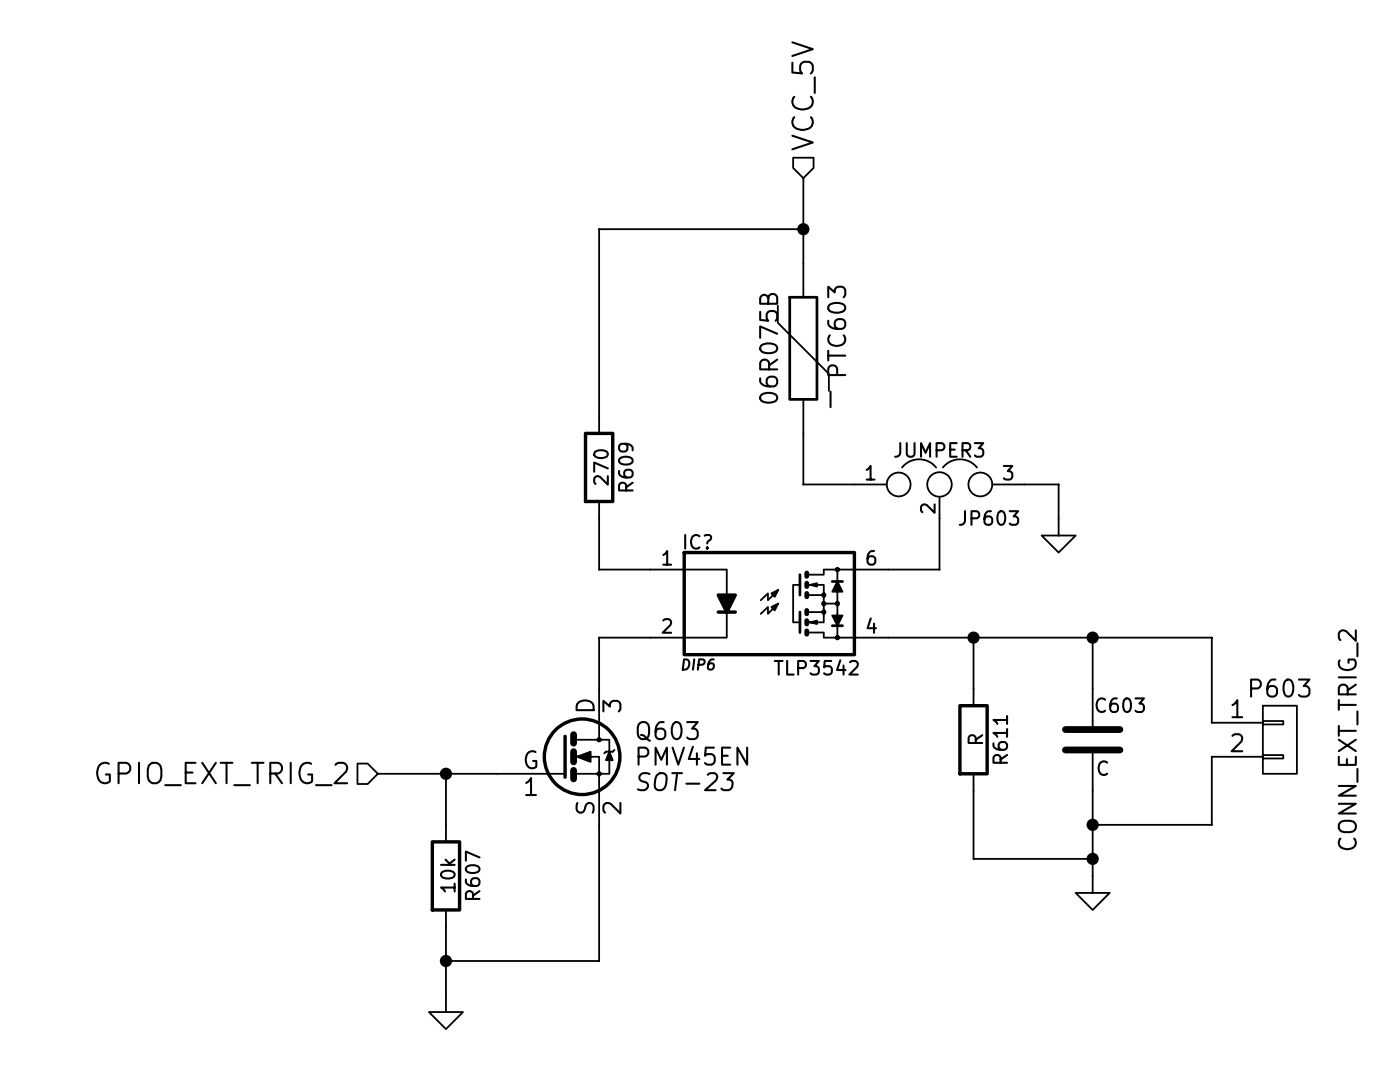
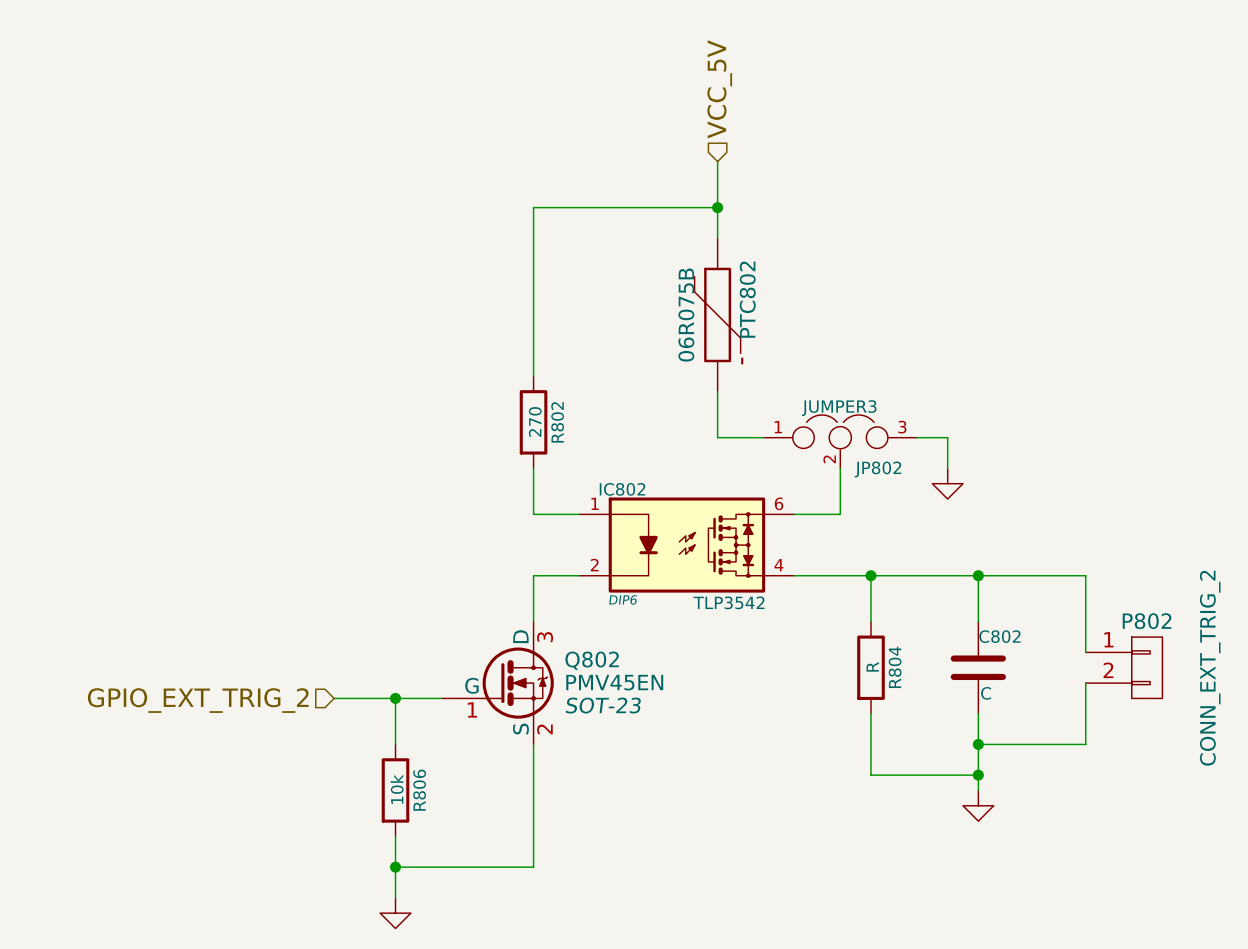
PTC603 name: PTC603 (836, 330) -> PTC802 (747, 299)
R609 name: R609 (625, 467) -> R802 (557, 422)
JP603 name: JP603 (988, 518) -> JP802 (878, 469)
IC? name: IC? (698, 541) -> IC802 (622, 489)
P603 name: P603 (1280, 688) -> P802 (1147, 621)
C603 name: C603 (1120, 705) -> C802 (999, 636)
Q603 name: Q603 (667, 731) -> Q802 (592, 660)
R611 name: R611 (1000, 739) -> R804 (895, 667)
R607 name: R607 (472, 875) -> R806 (419, 790)

